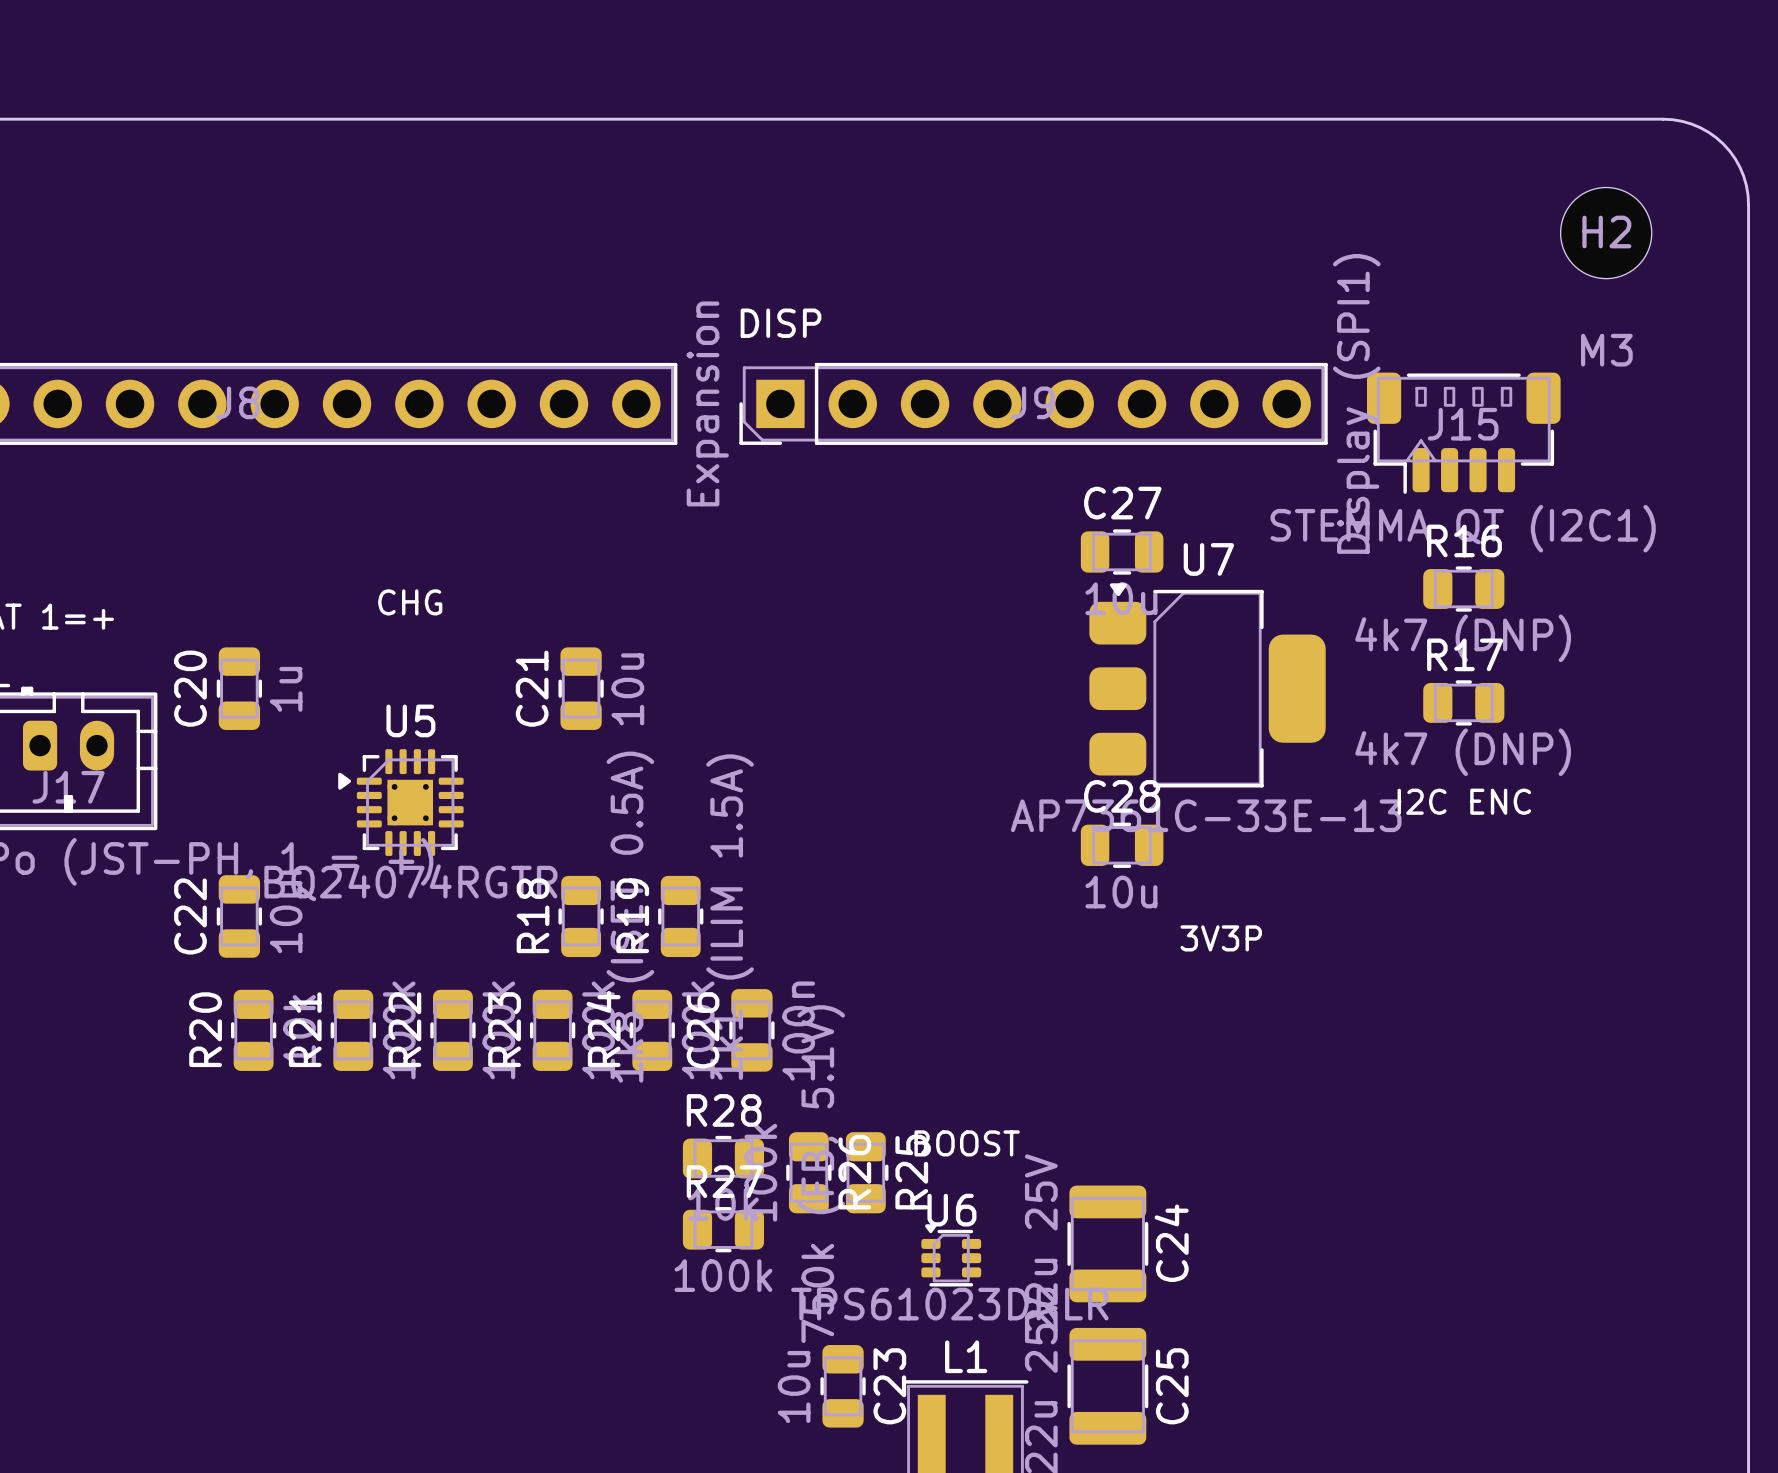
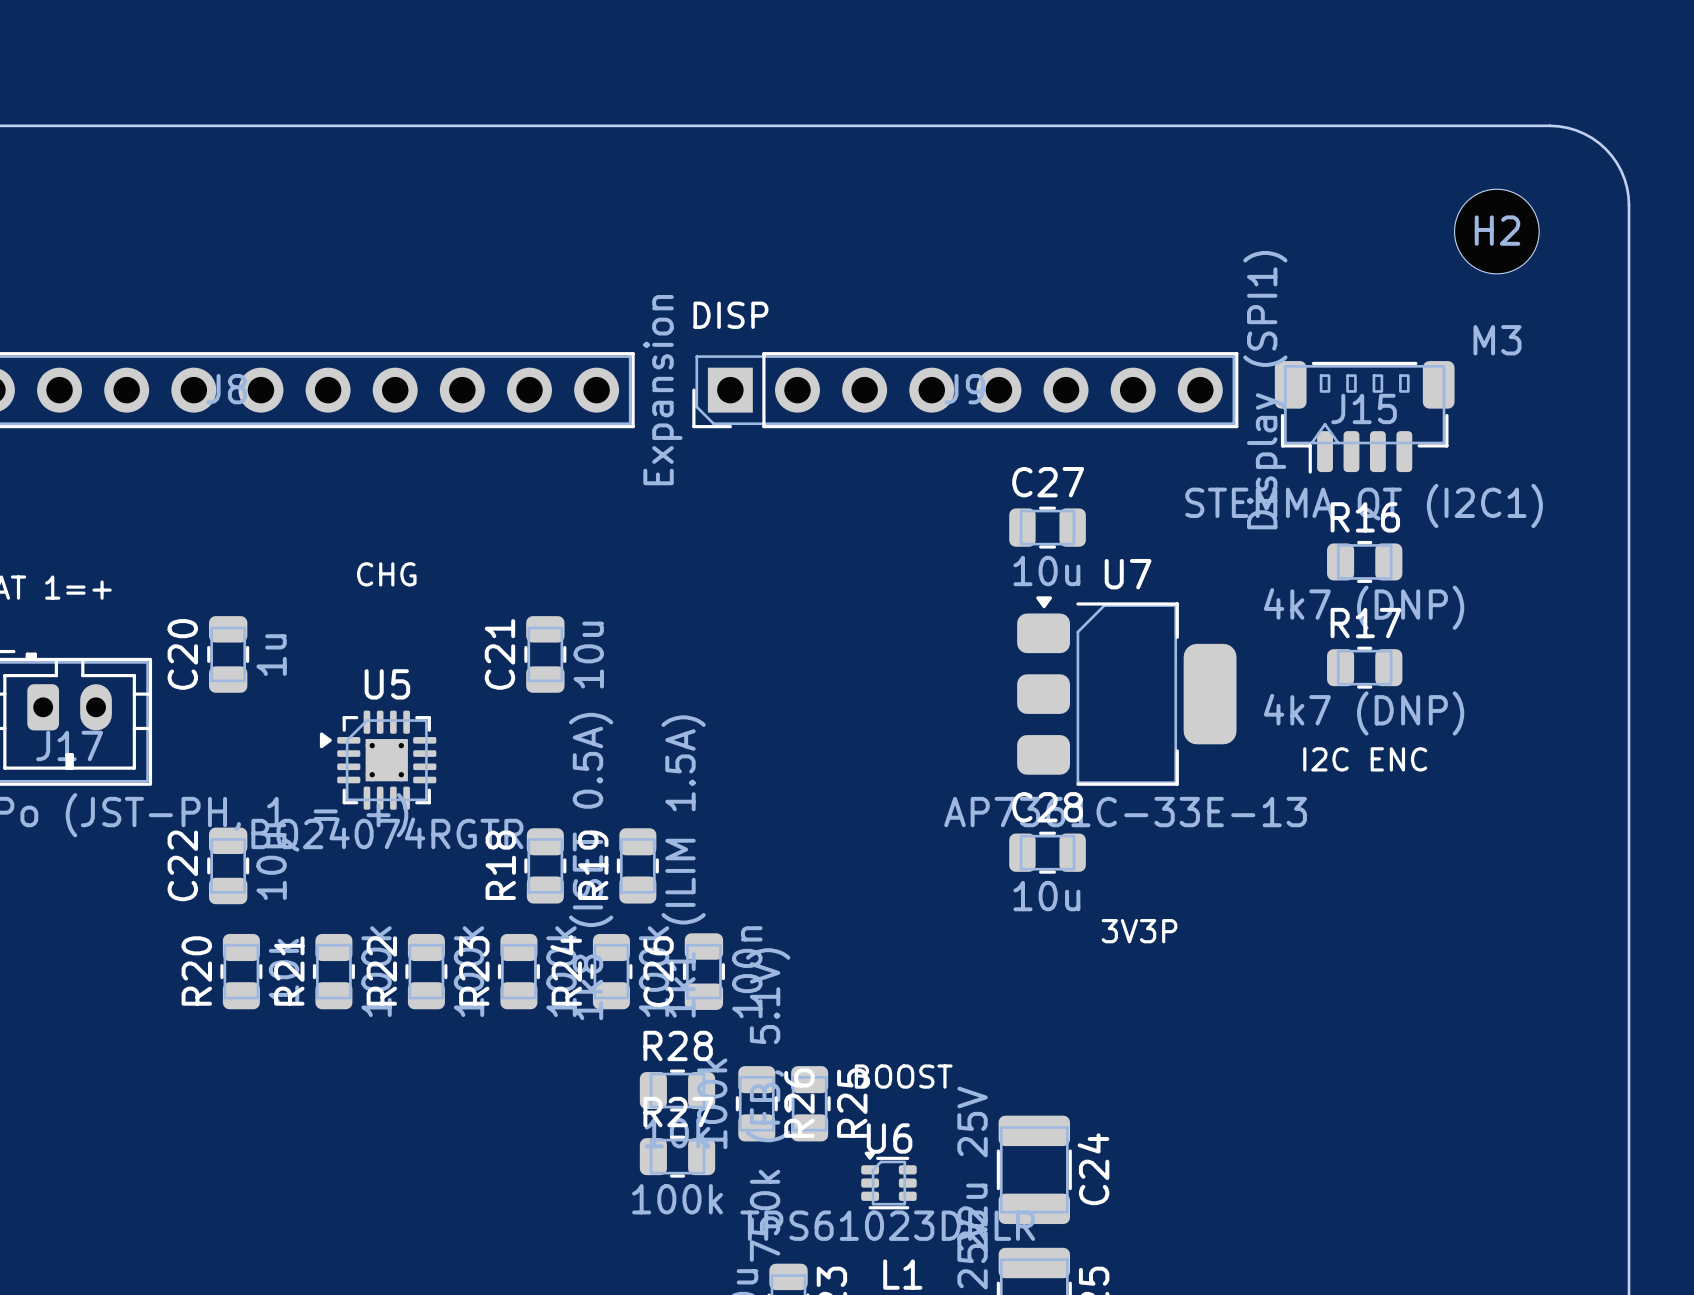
U7 position: (1207, 685) -> (1126, 691)
C28 position: (1122, 845) -> (1047, 852)
text position: 3V3P (1221, 938) -> 3V3P (1139, 931)

